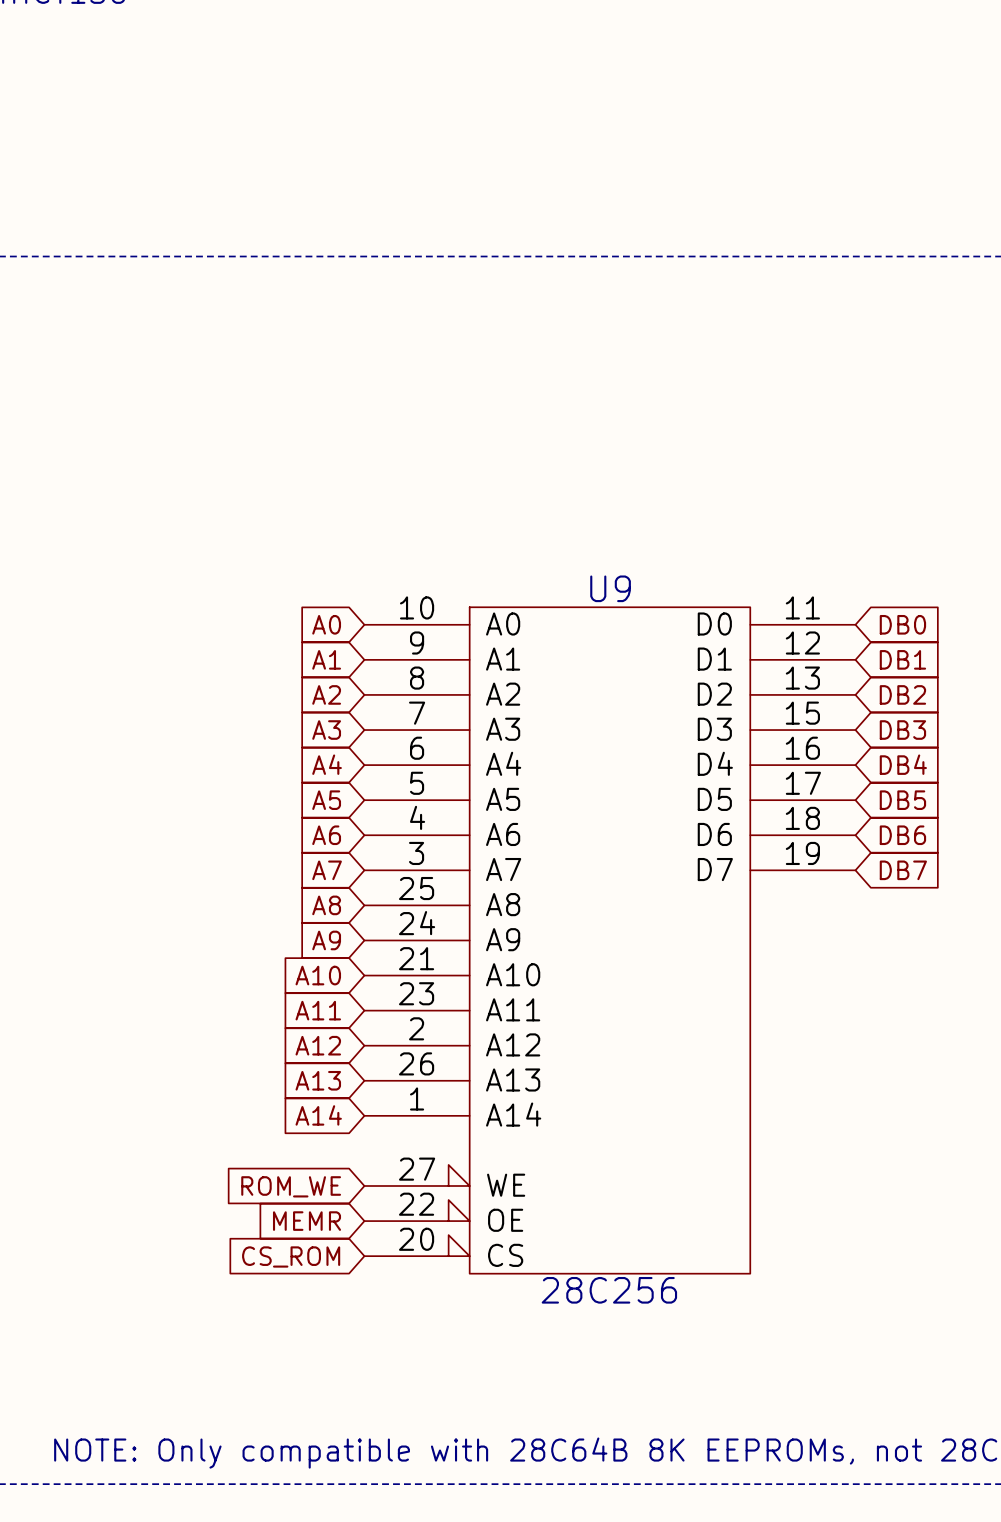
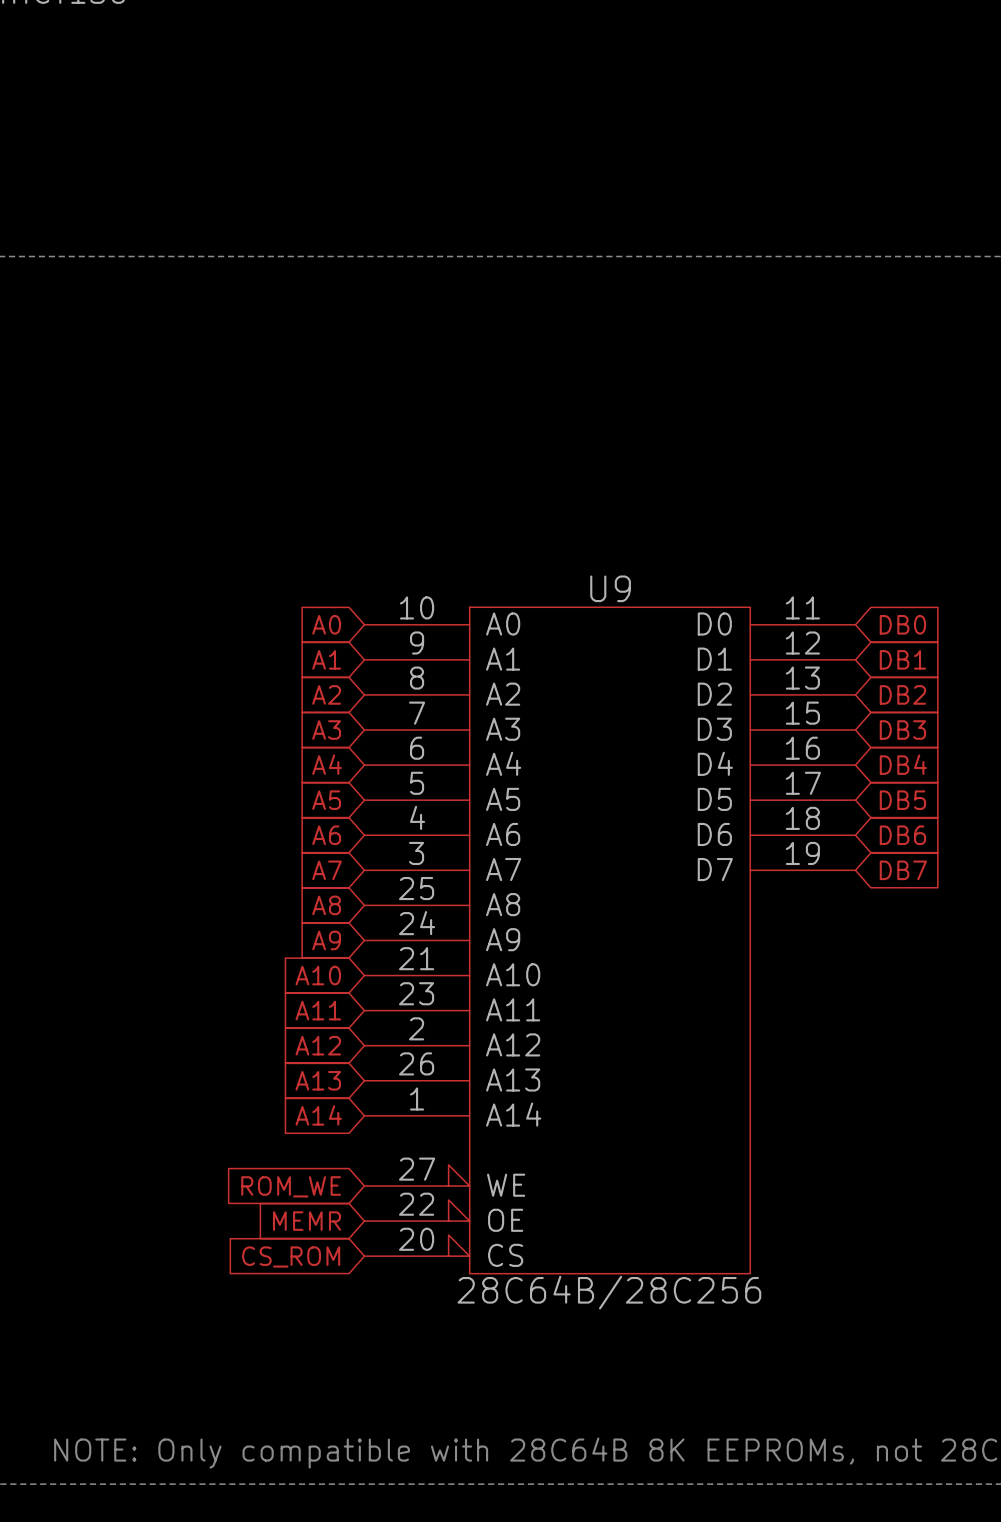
U9 value: 28C256 (609, 1290) -> 28C64B/28C256 (609, 1292)

